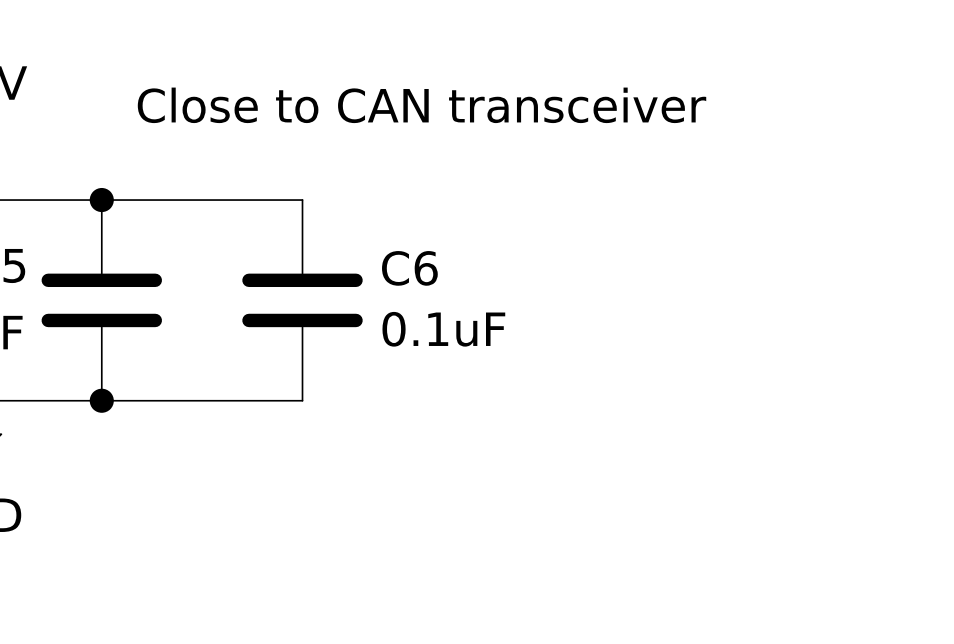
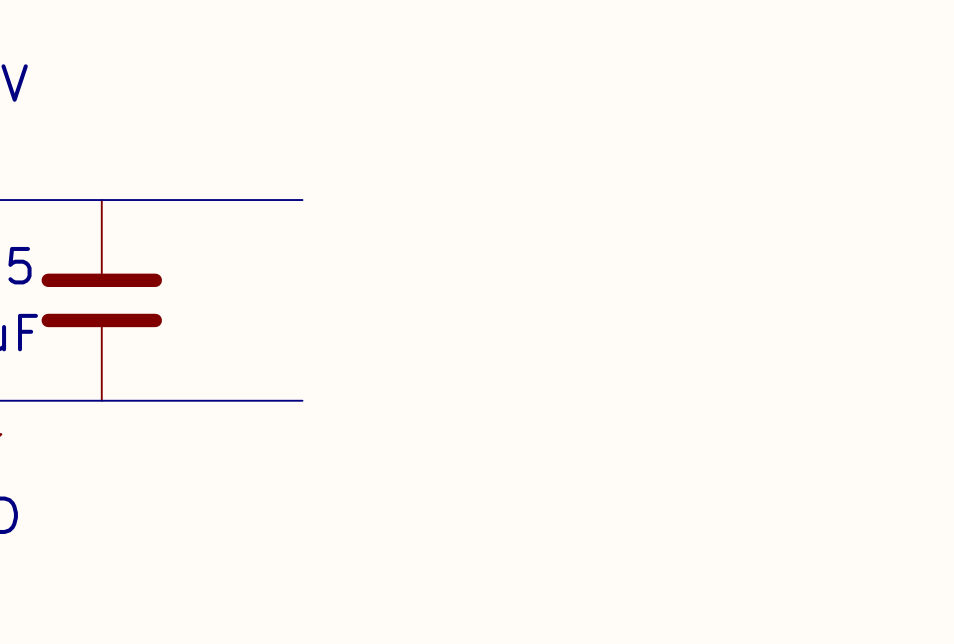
text: Close to CAN transceiver (422, 105) -> none
junction: (101, 200) -> none
C6: 0.1uF (302, 300) -> none
junction: (101, 400) -> none

